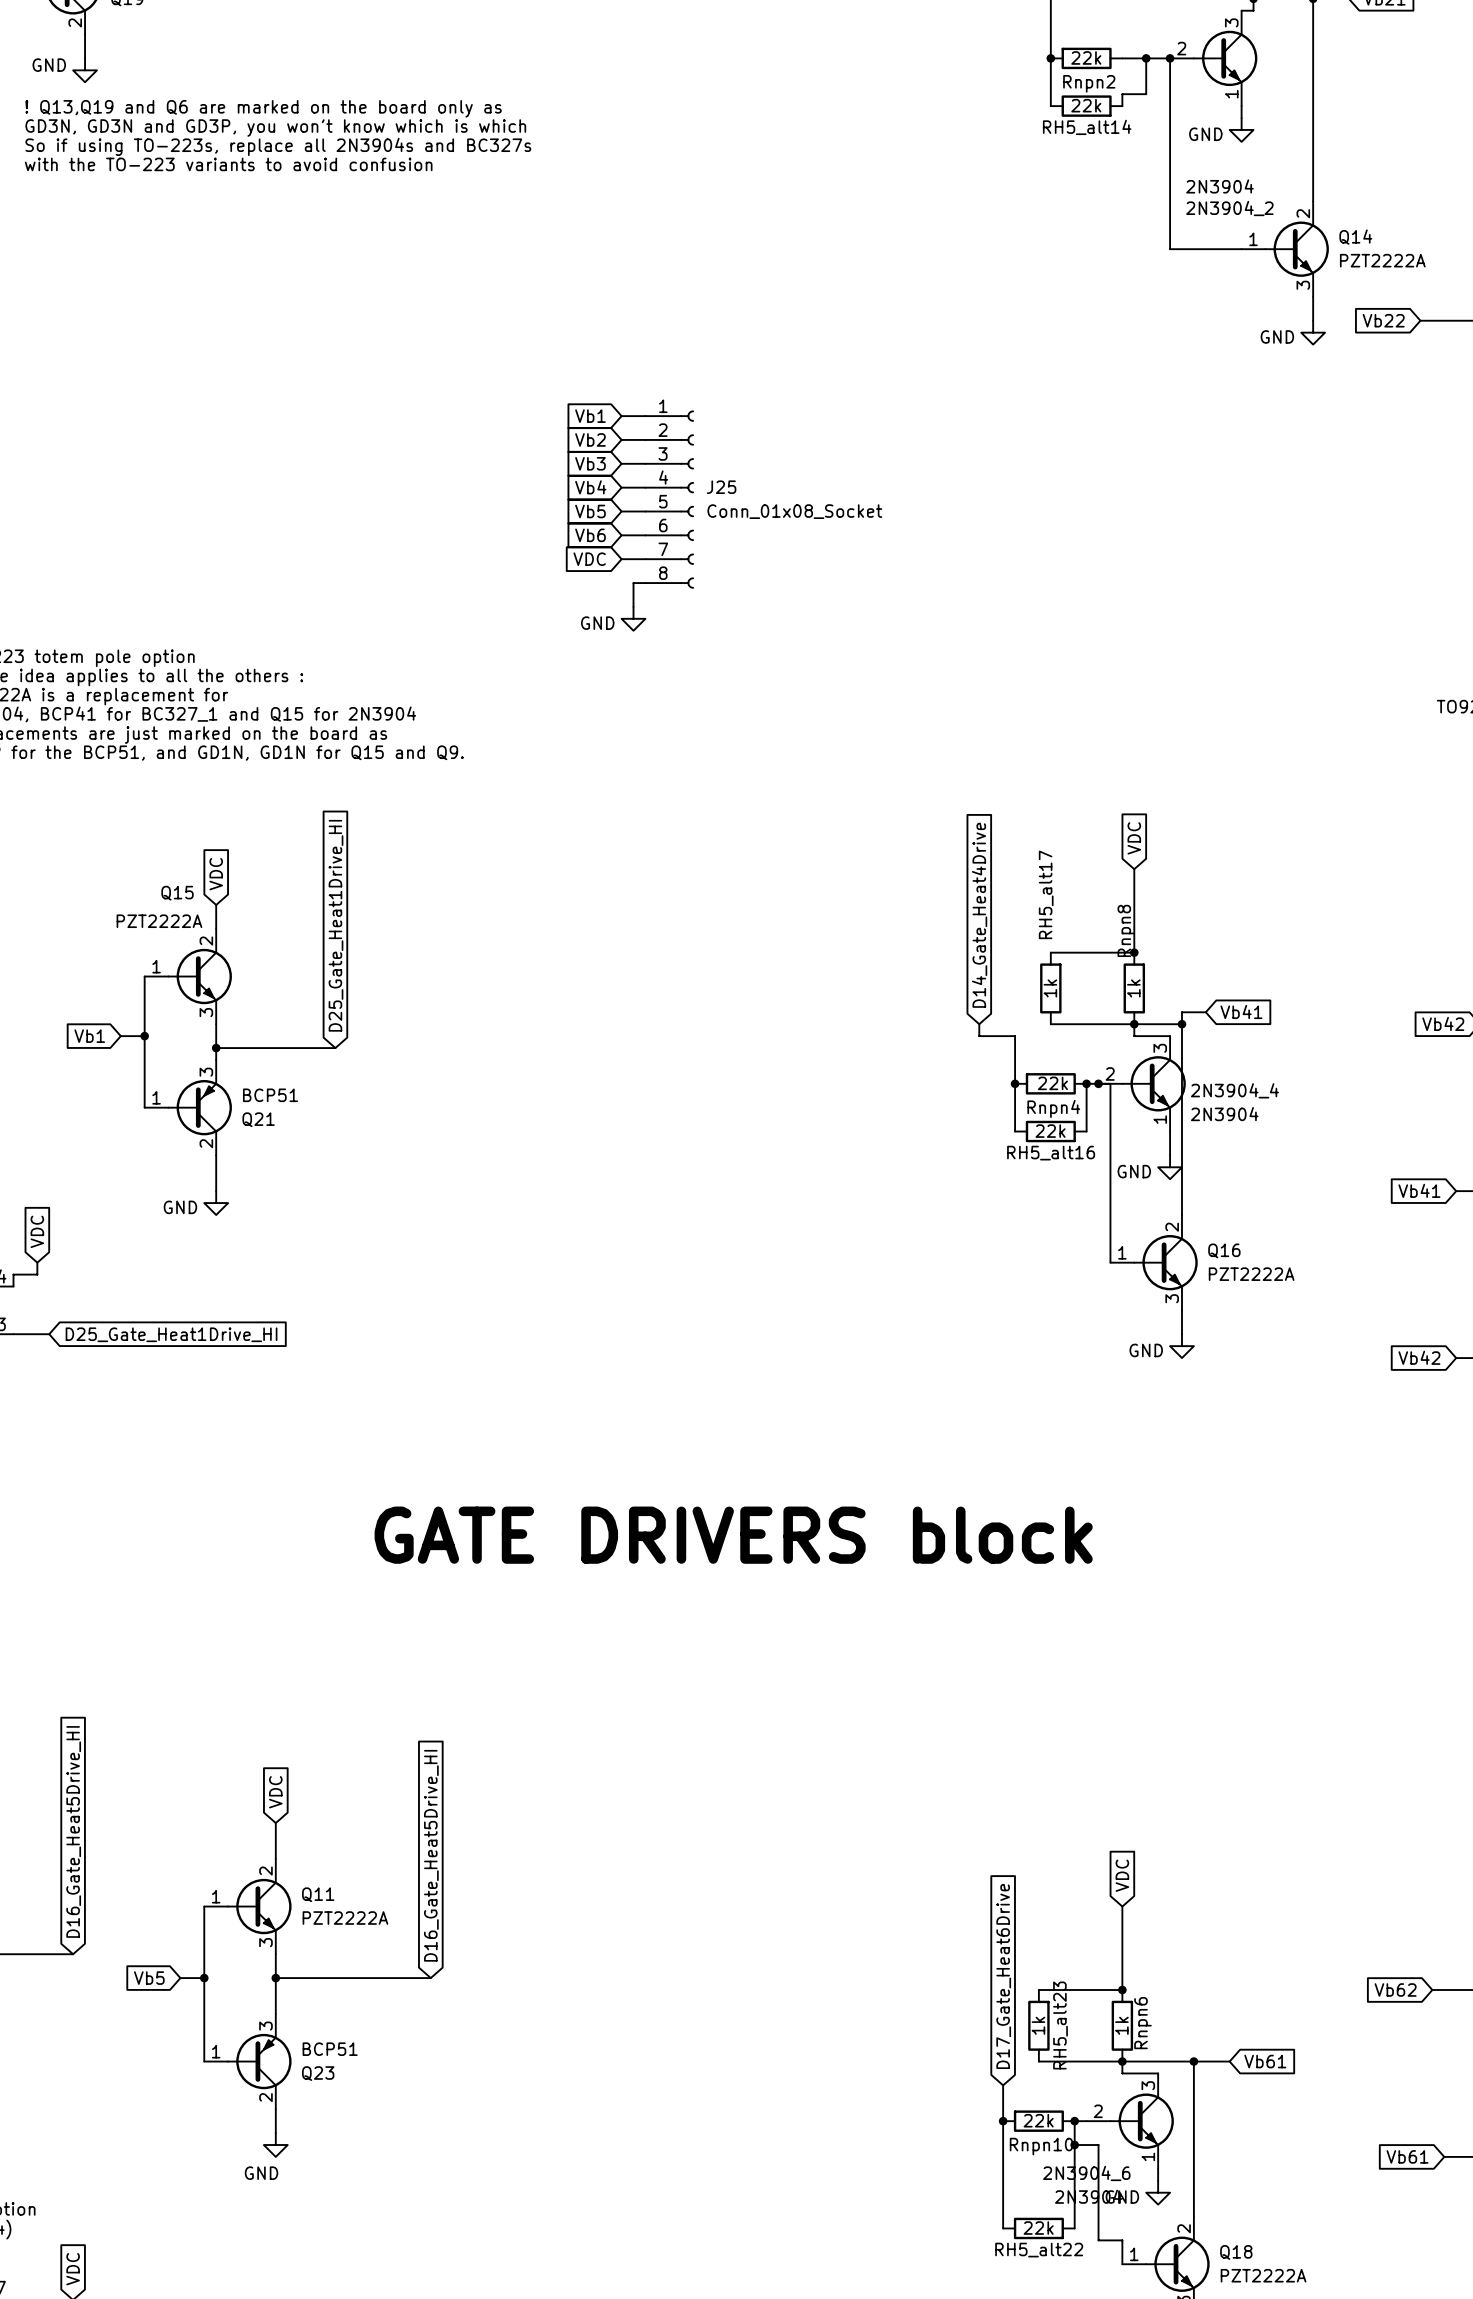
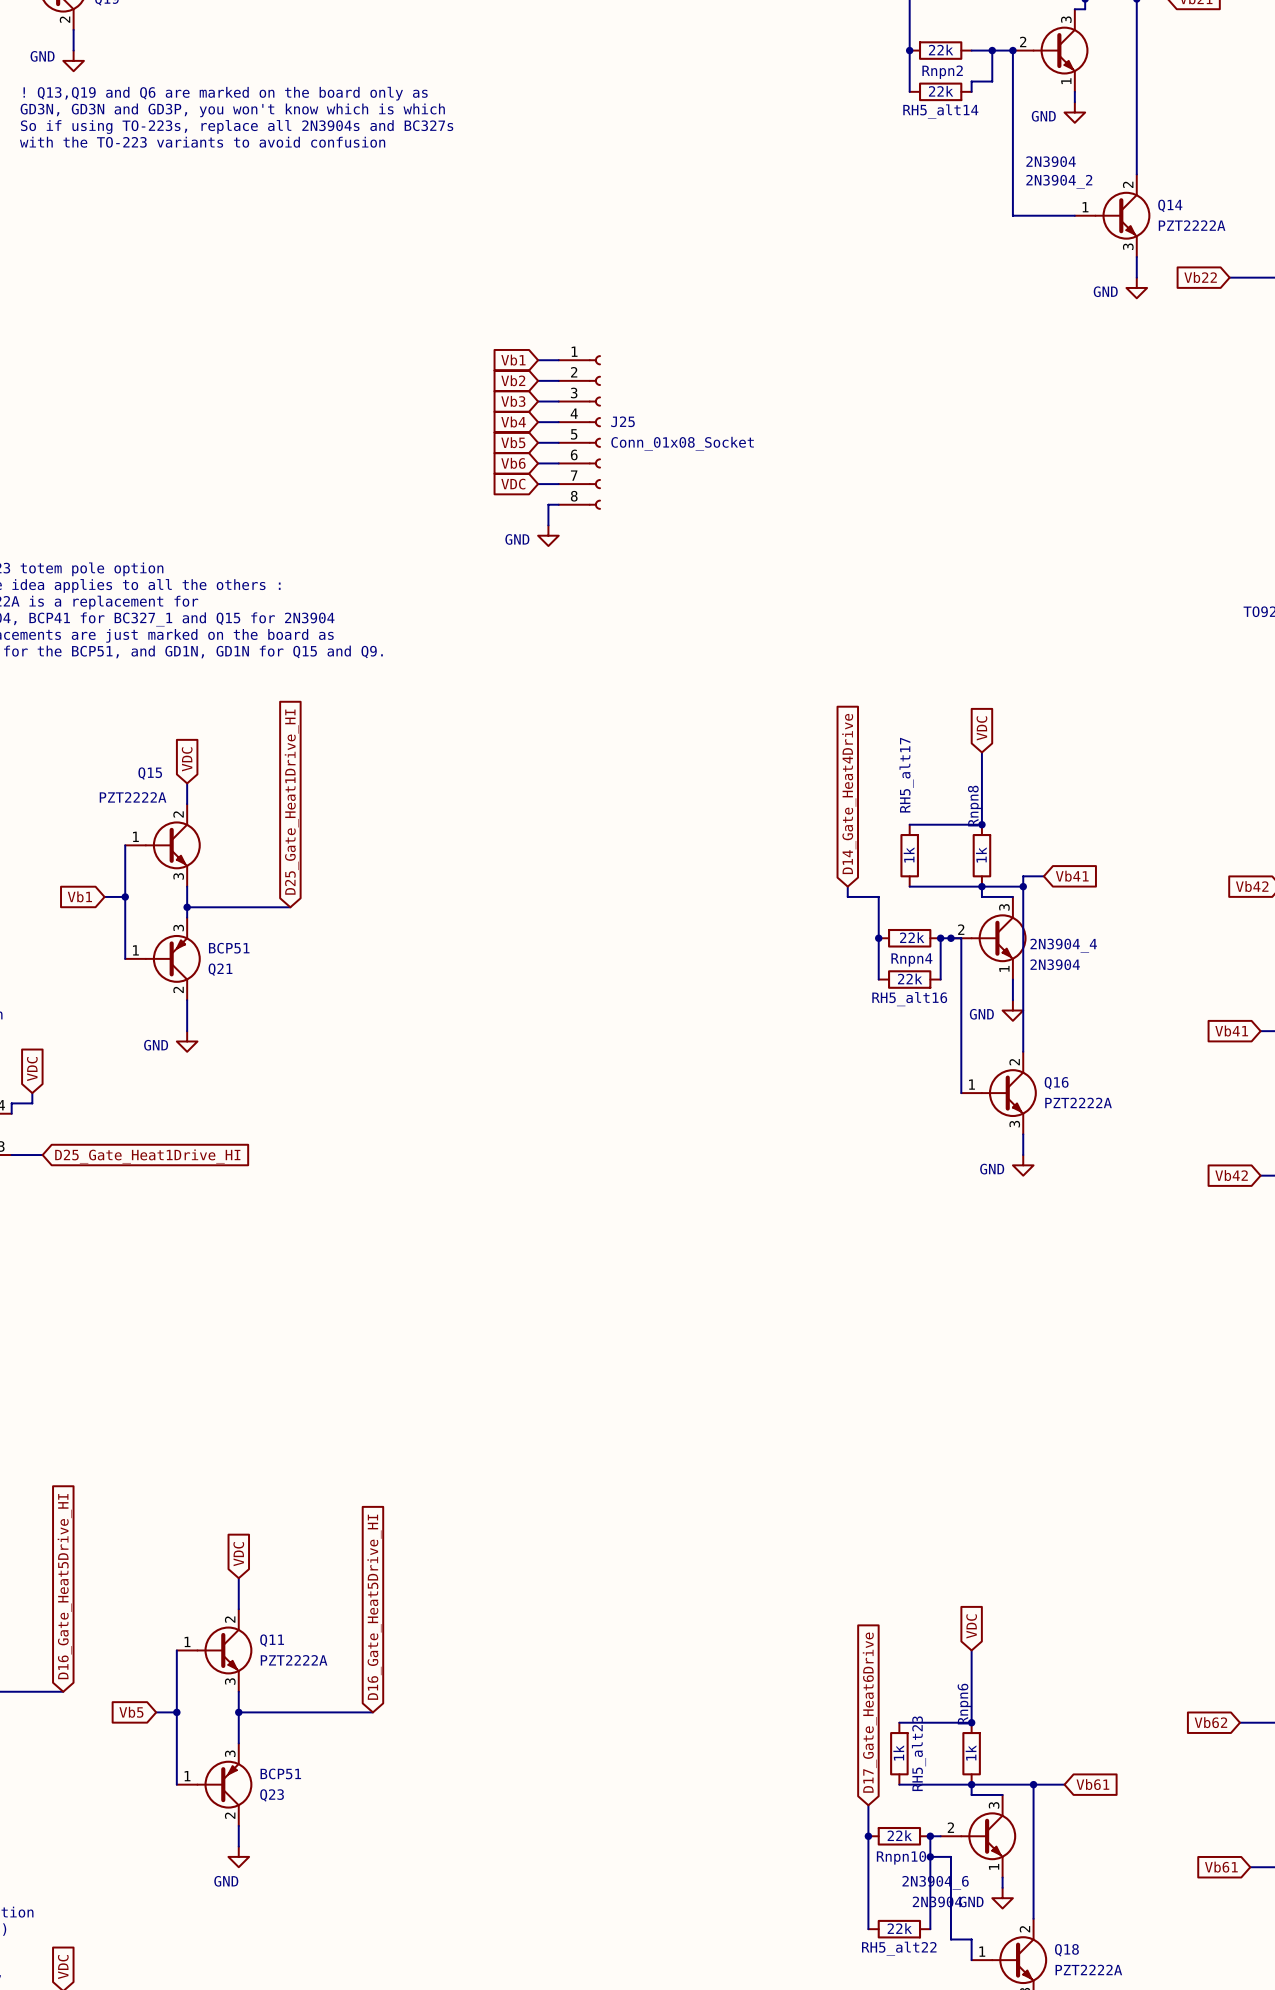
text: GATE DRIVERS block (733, 1535) -> none
Rnpn6 name position: Rnpn6 (1142, 2023) -> Rnpn6 (964, 1704)

